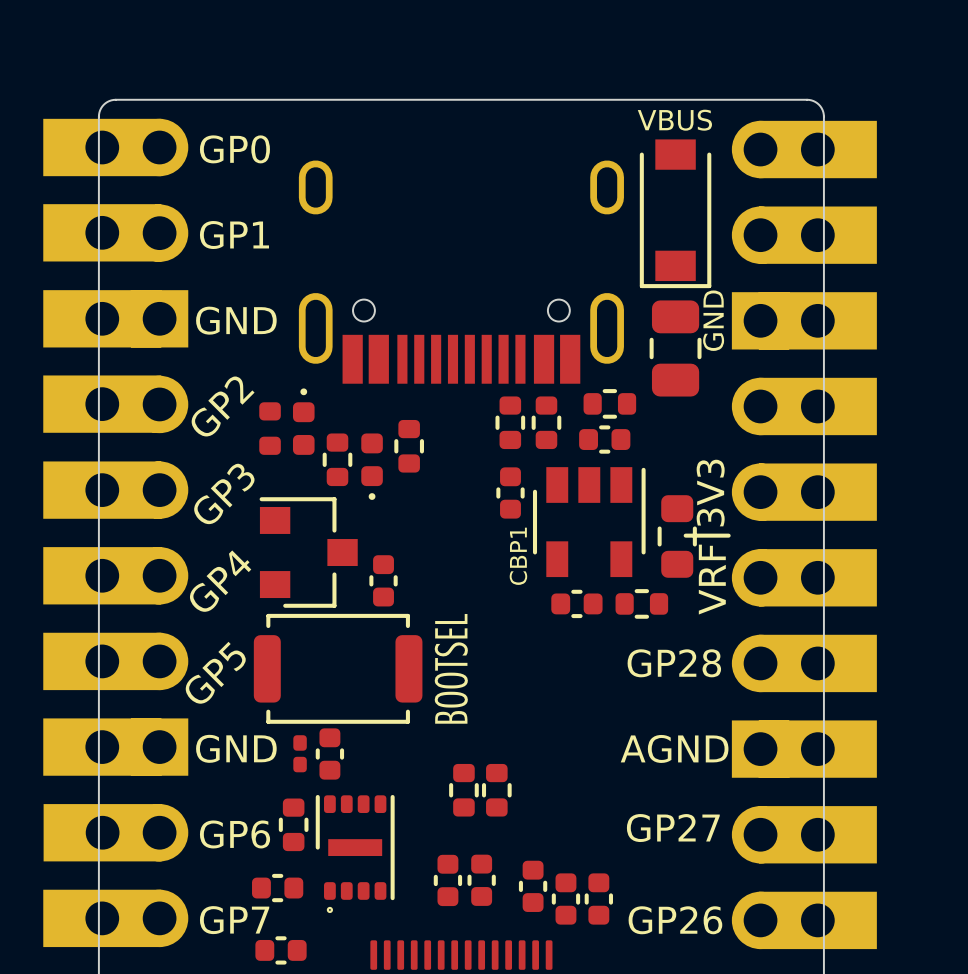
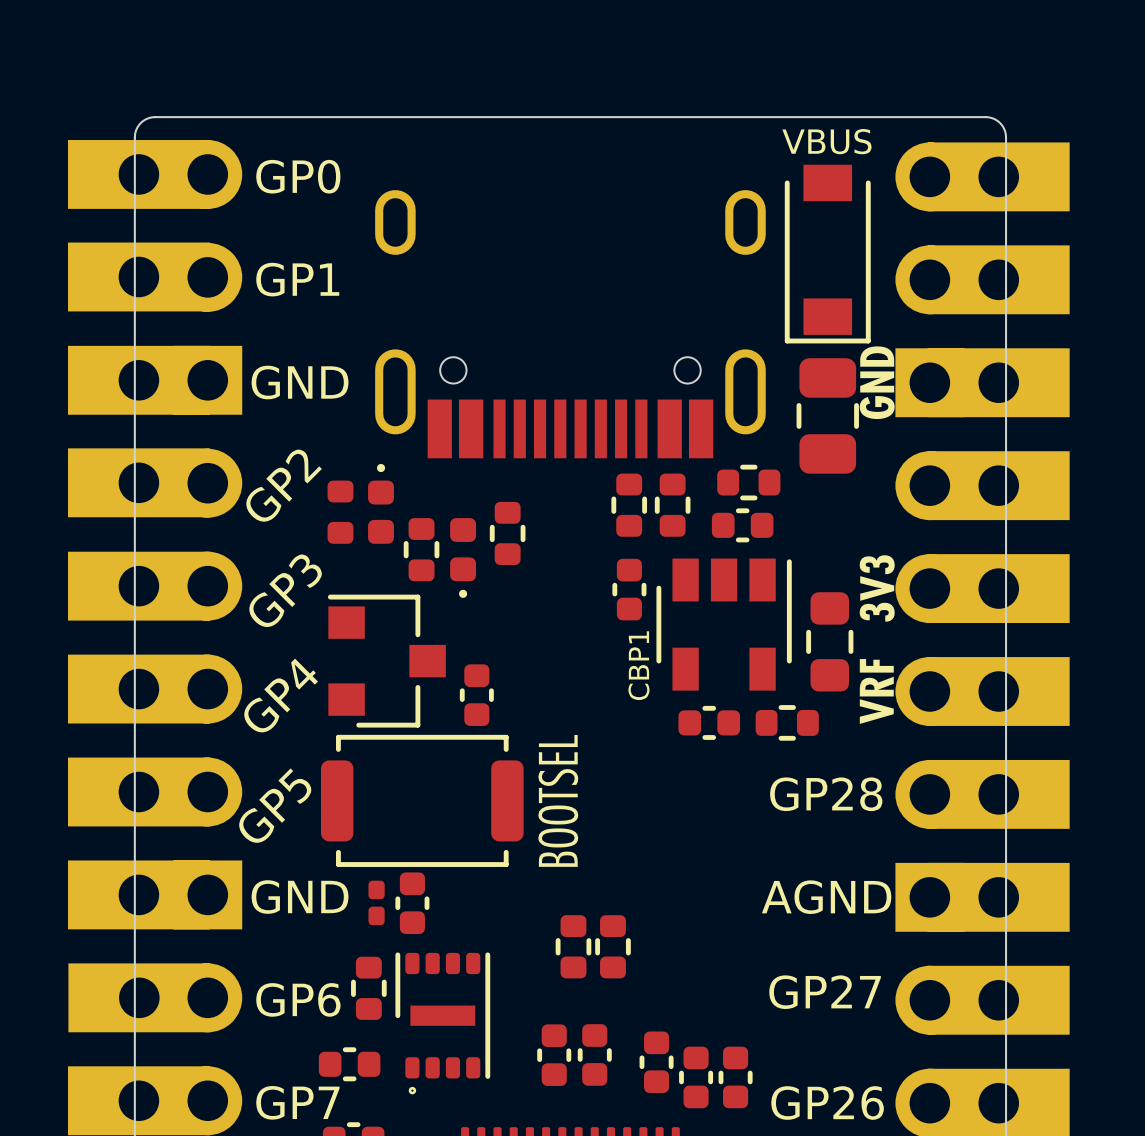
drawing: none -> [859, 346, 895, 420]
text: GND (713, 320) -> none
drawing: none -> [859, 555, 895, 724]
text: 3V3 (710, 493) -> none
line: (685, 535) (728, 535) -> none
text: VRF (712, 579) -> none

